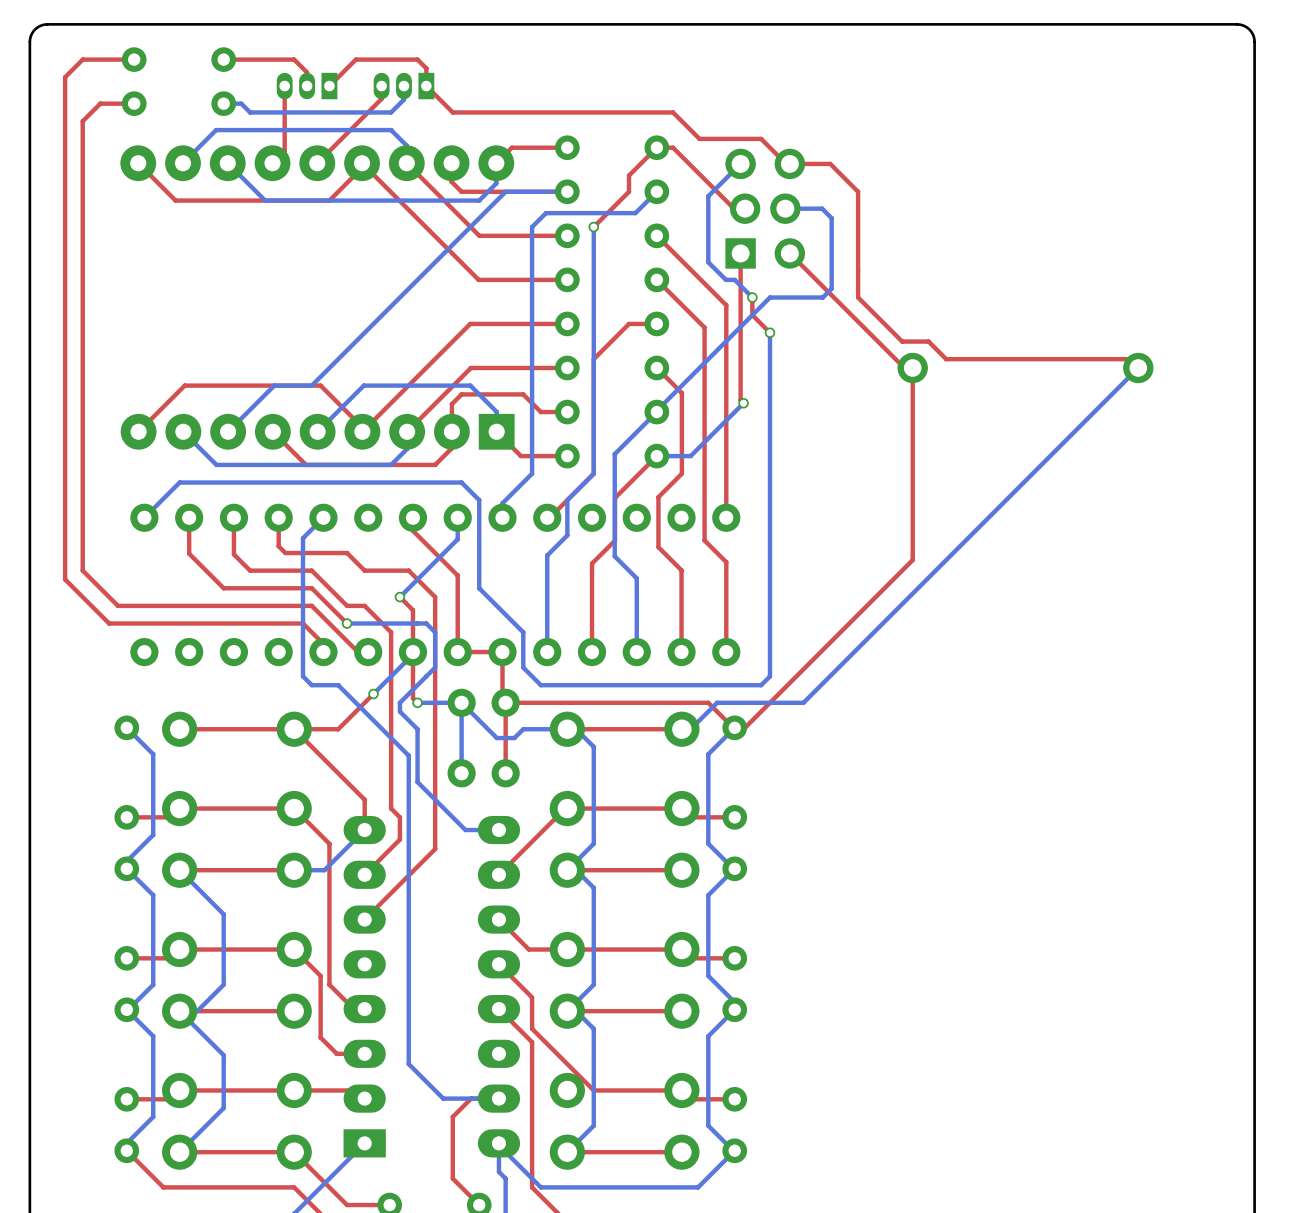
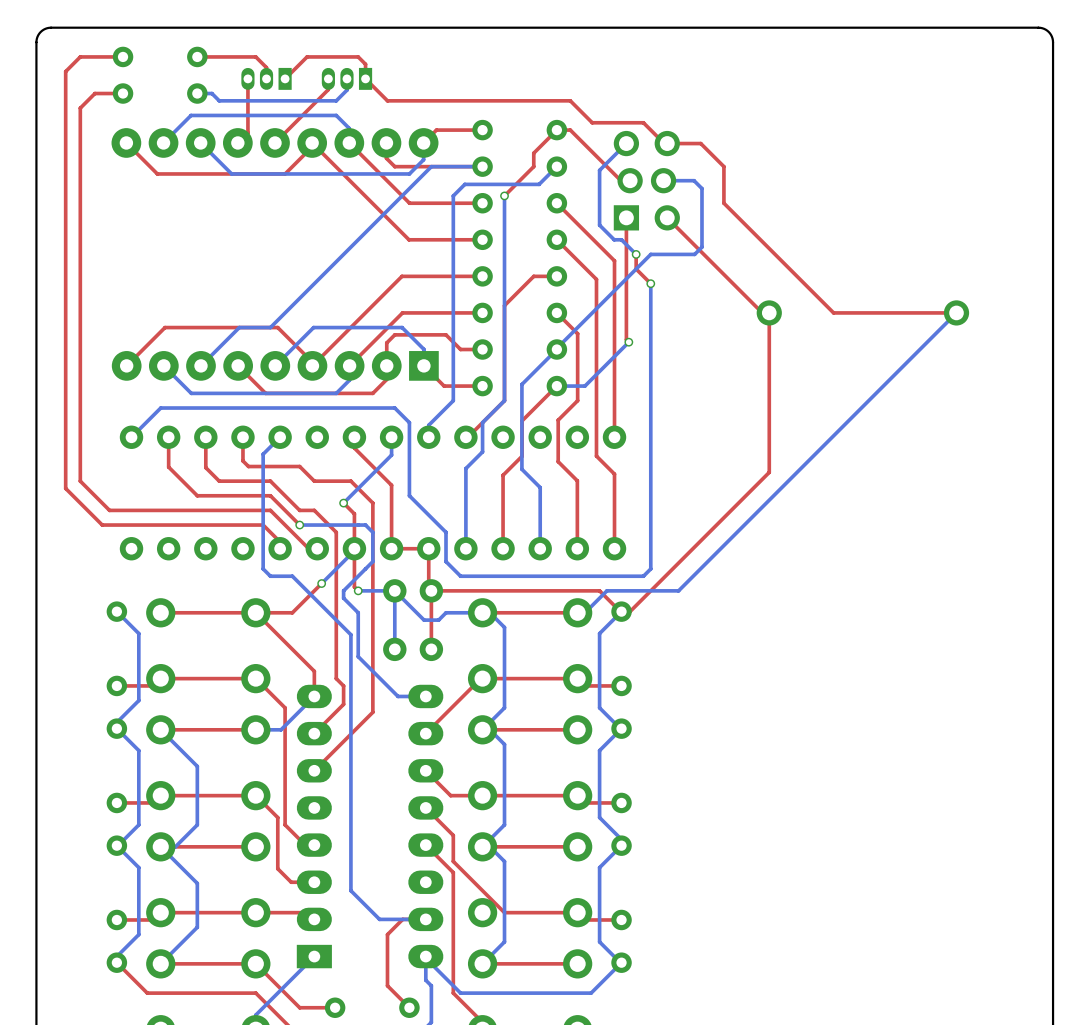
top track: (858, 235) (858, 297) (902, 341) (928, 341) (946, 359) (1129, 359) (1138, 367) -> (723, 203) (833, 312) (956, 312)

